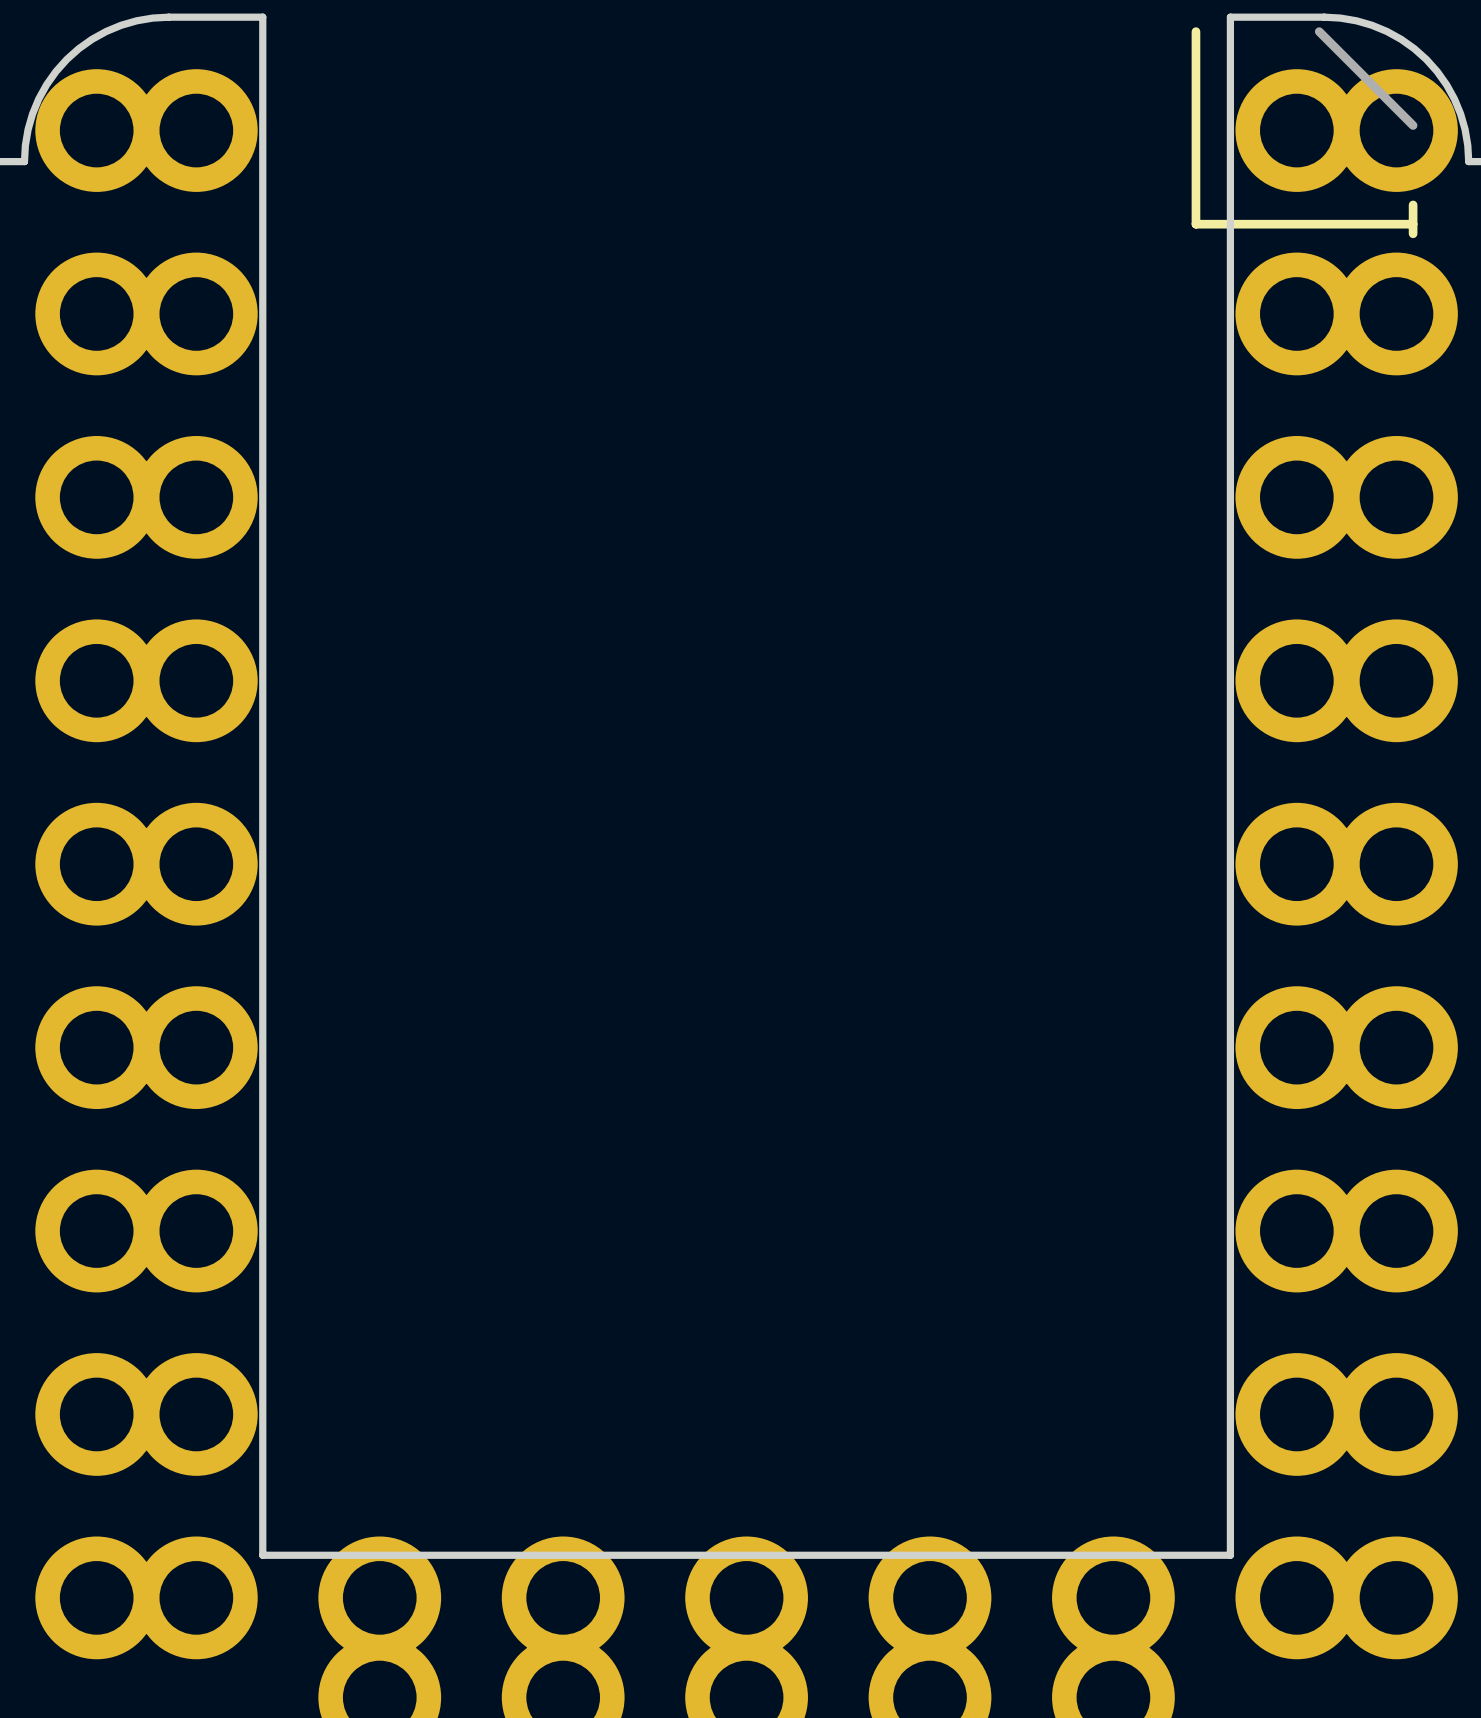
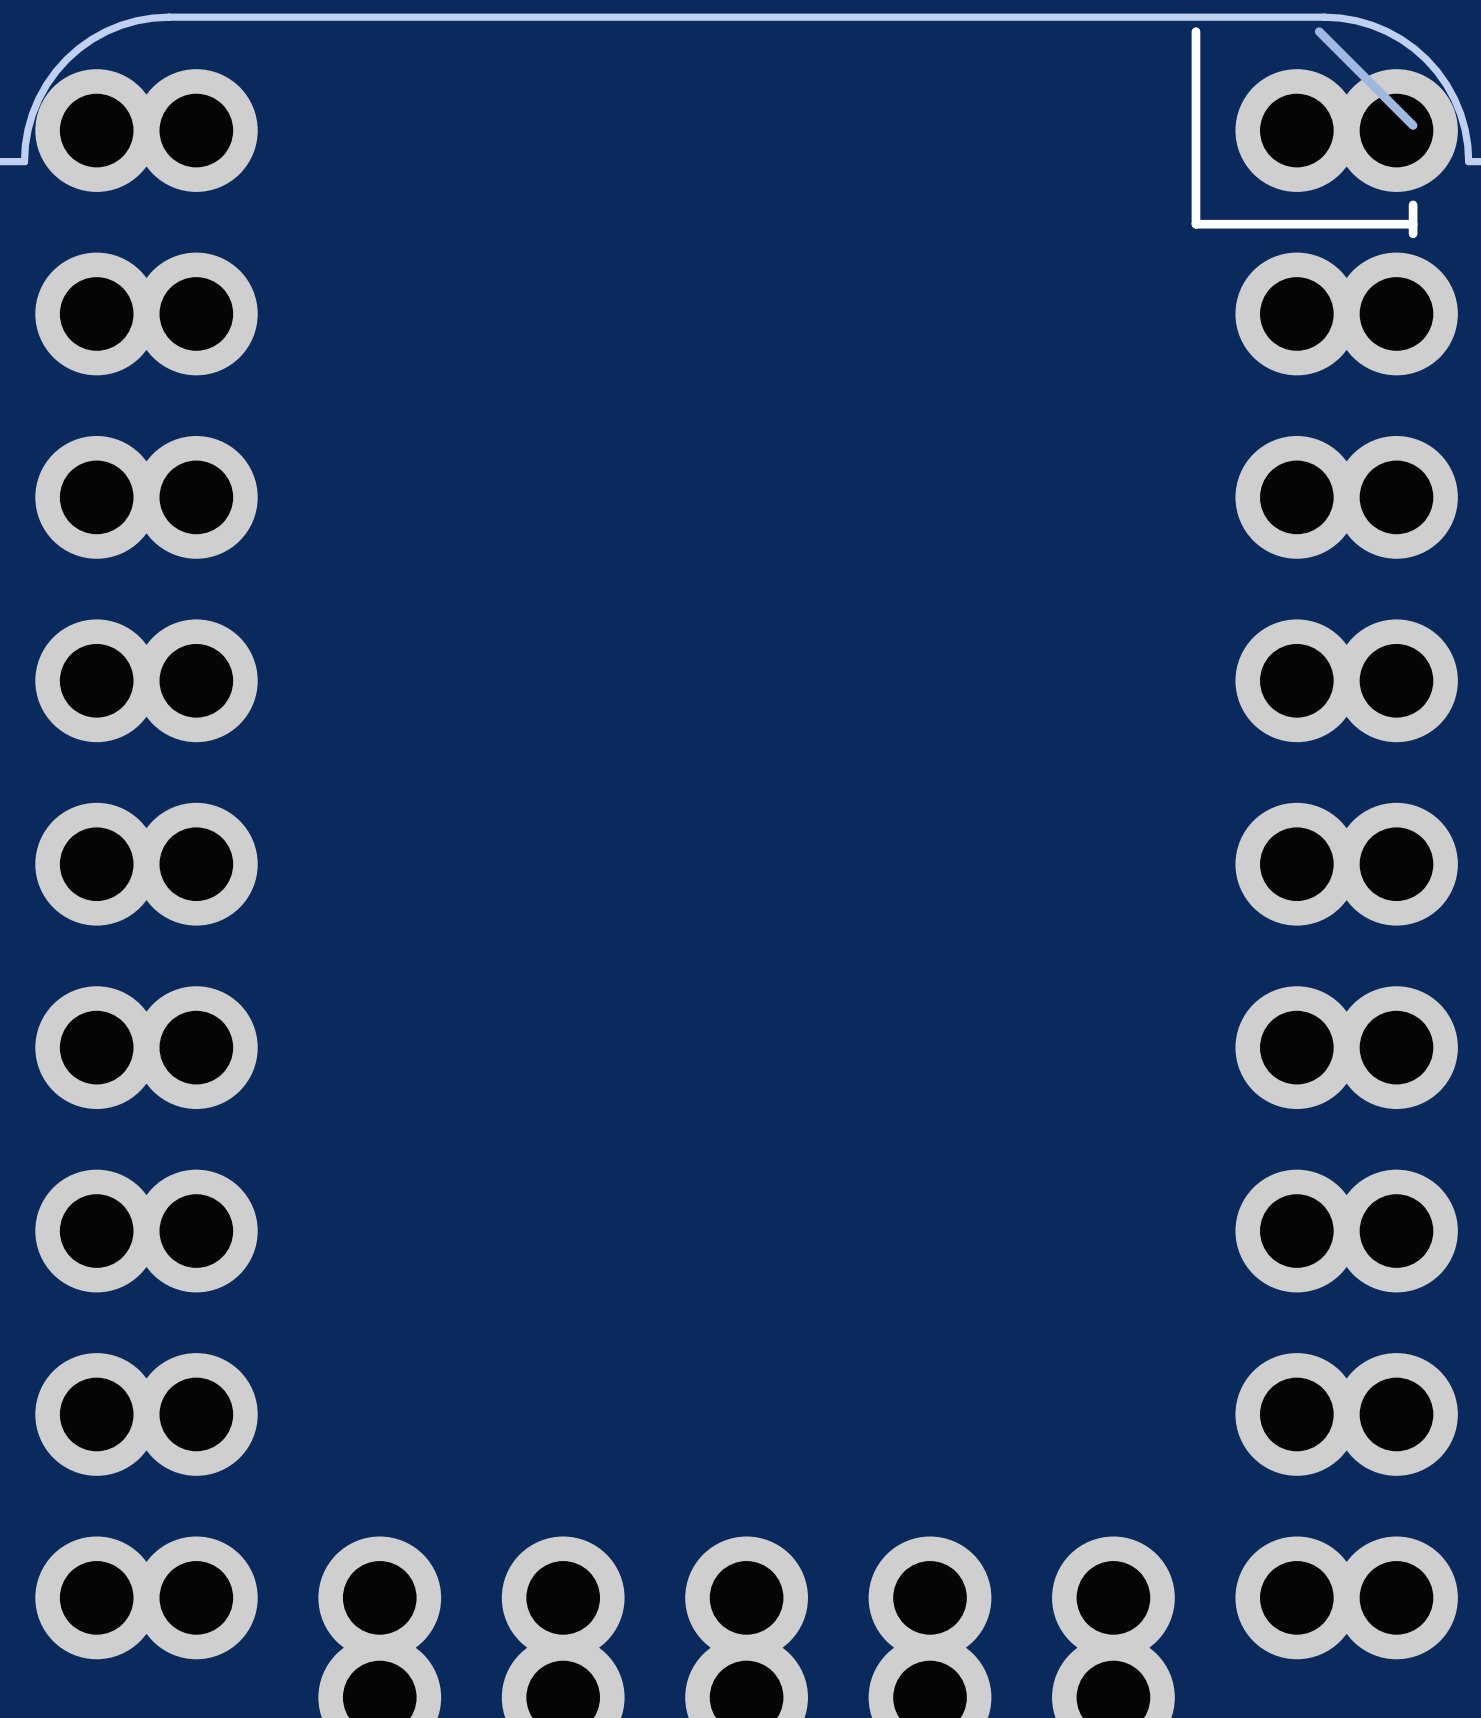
board edge: (262, 17) (262, 1555) (1230, 1555) (1230, 17) -> (262, 17) (1230, 17)

